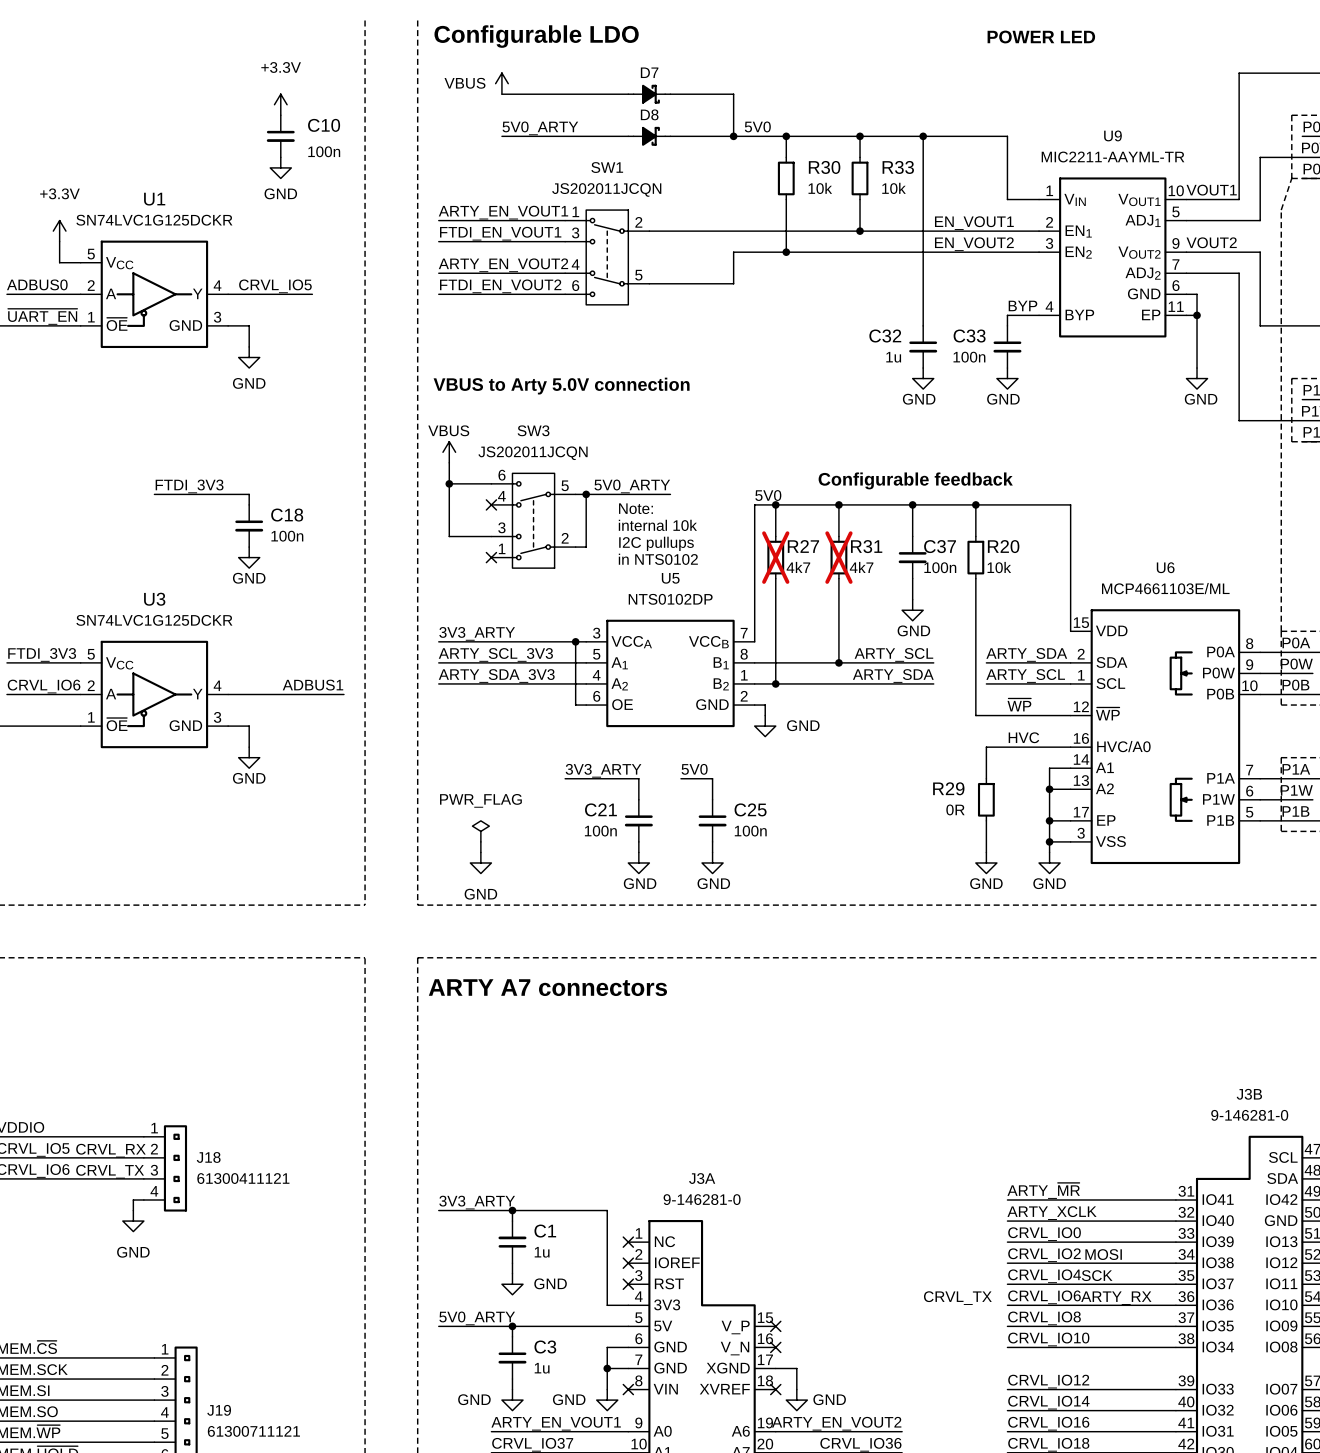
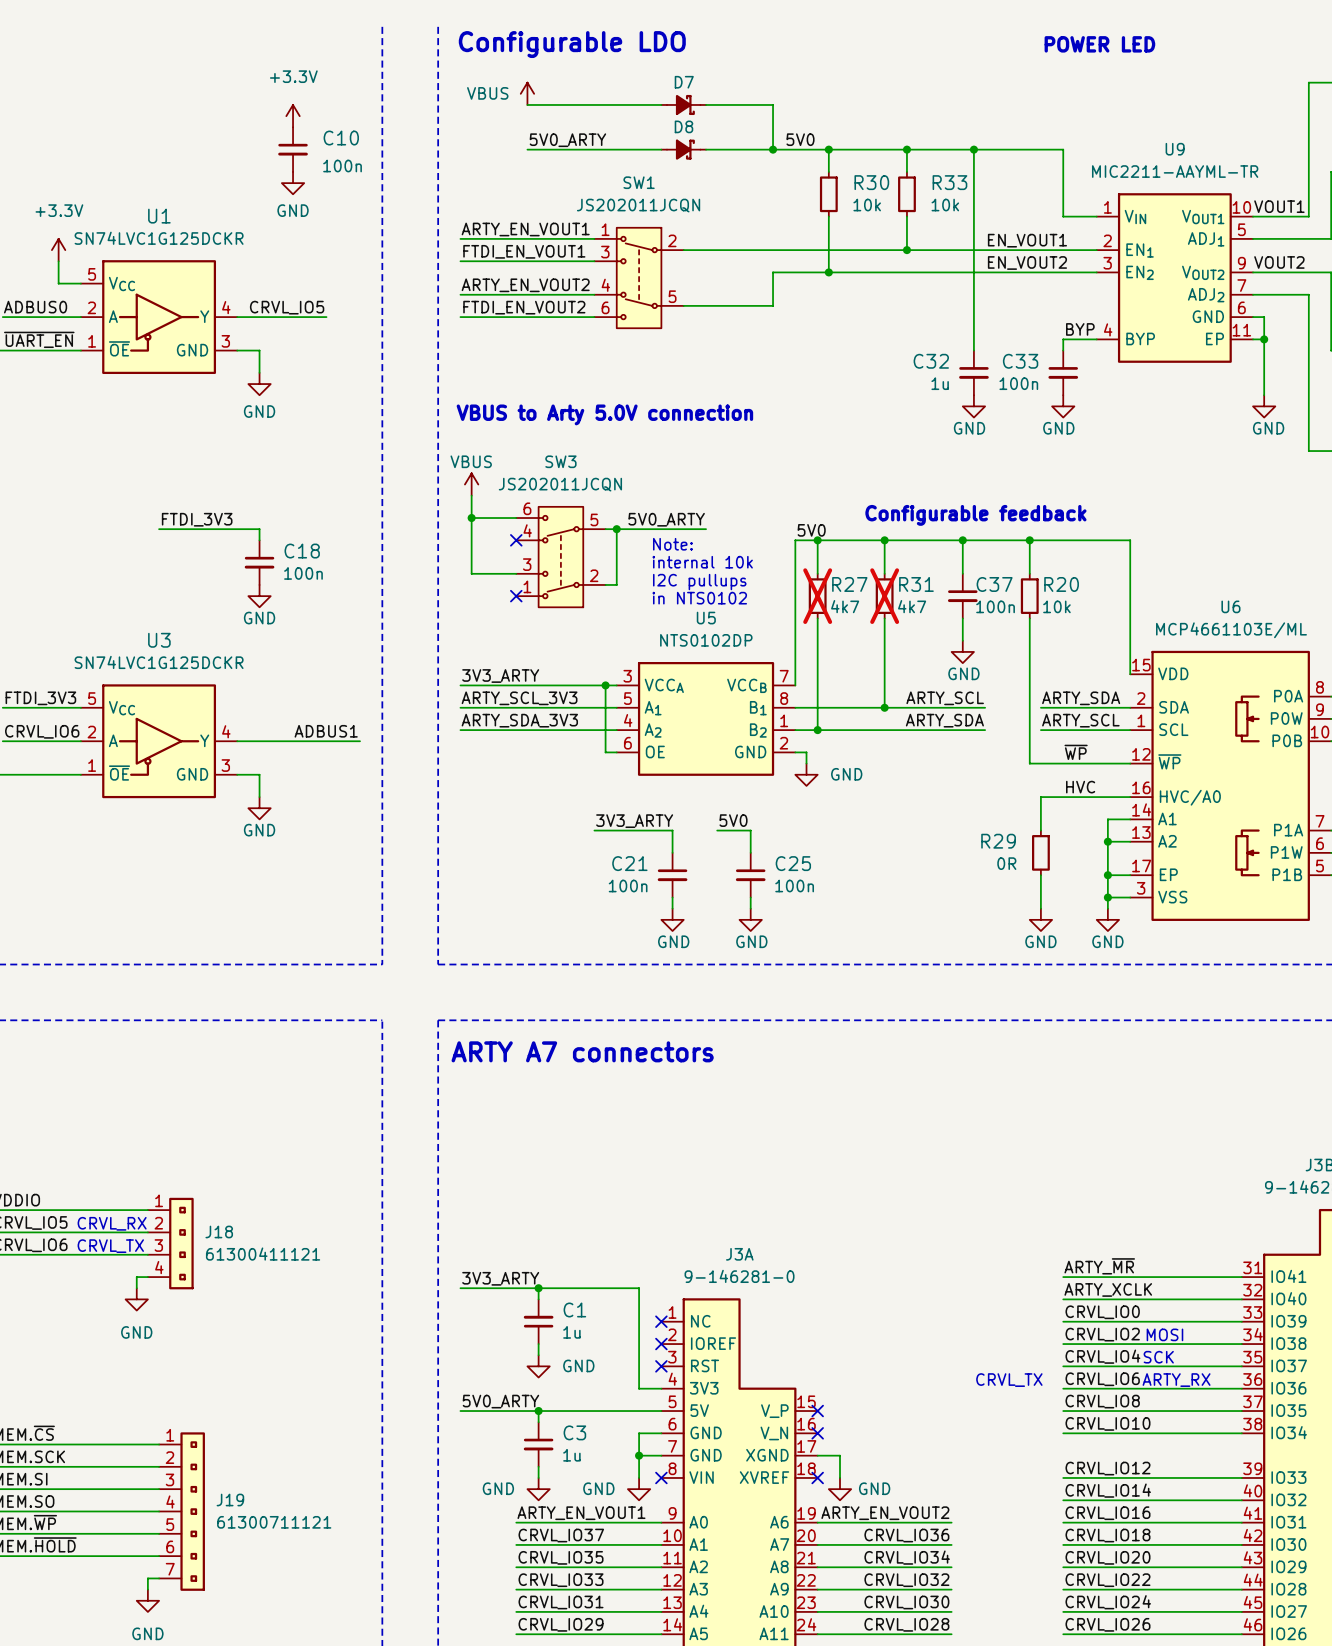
power symbol: PWR_FLAG (480, 831) -> none
wire: (480, 841) (480, 852) -> none
power symbol: GND (480, 862) -> none

